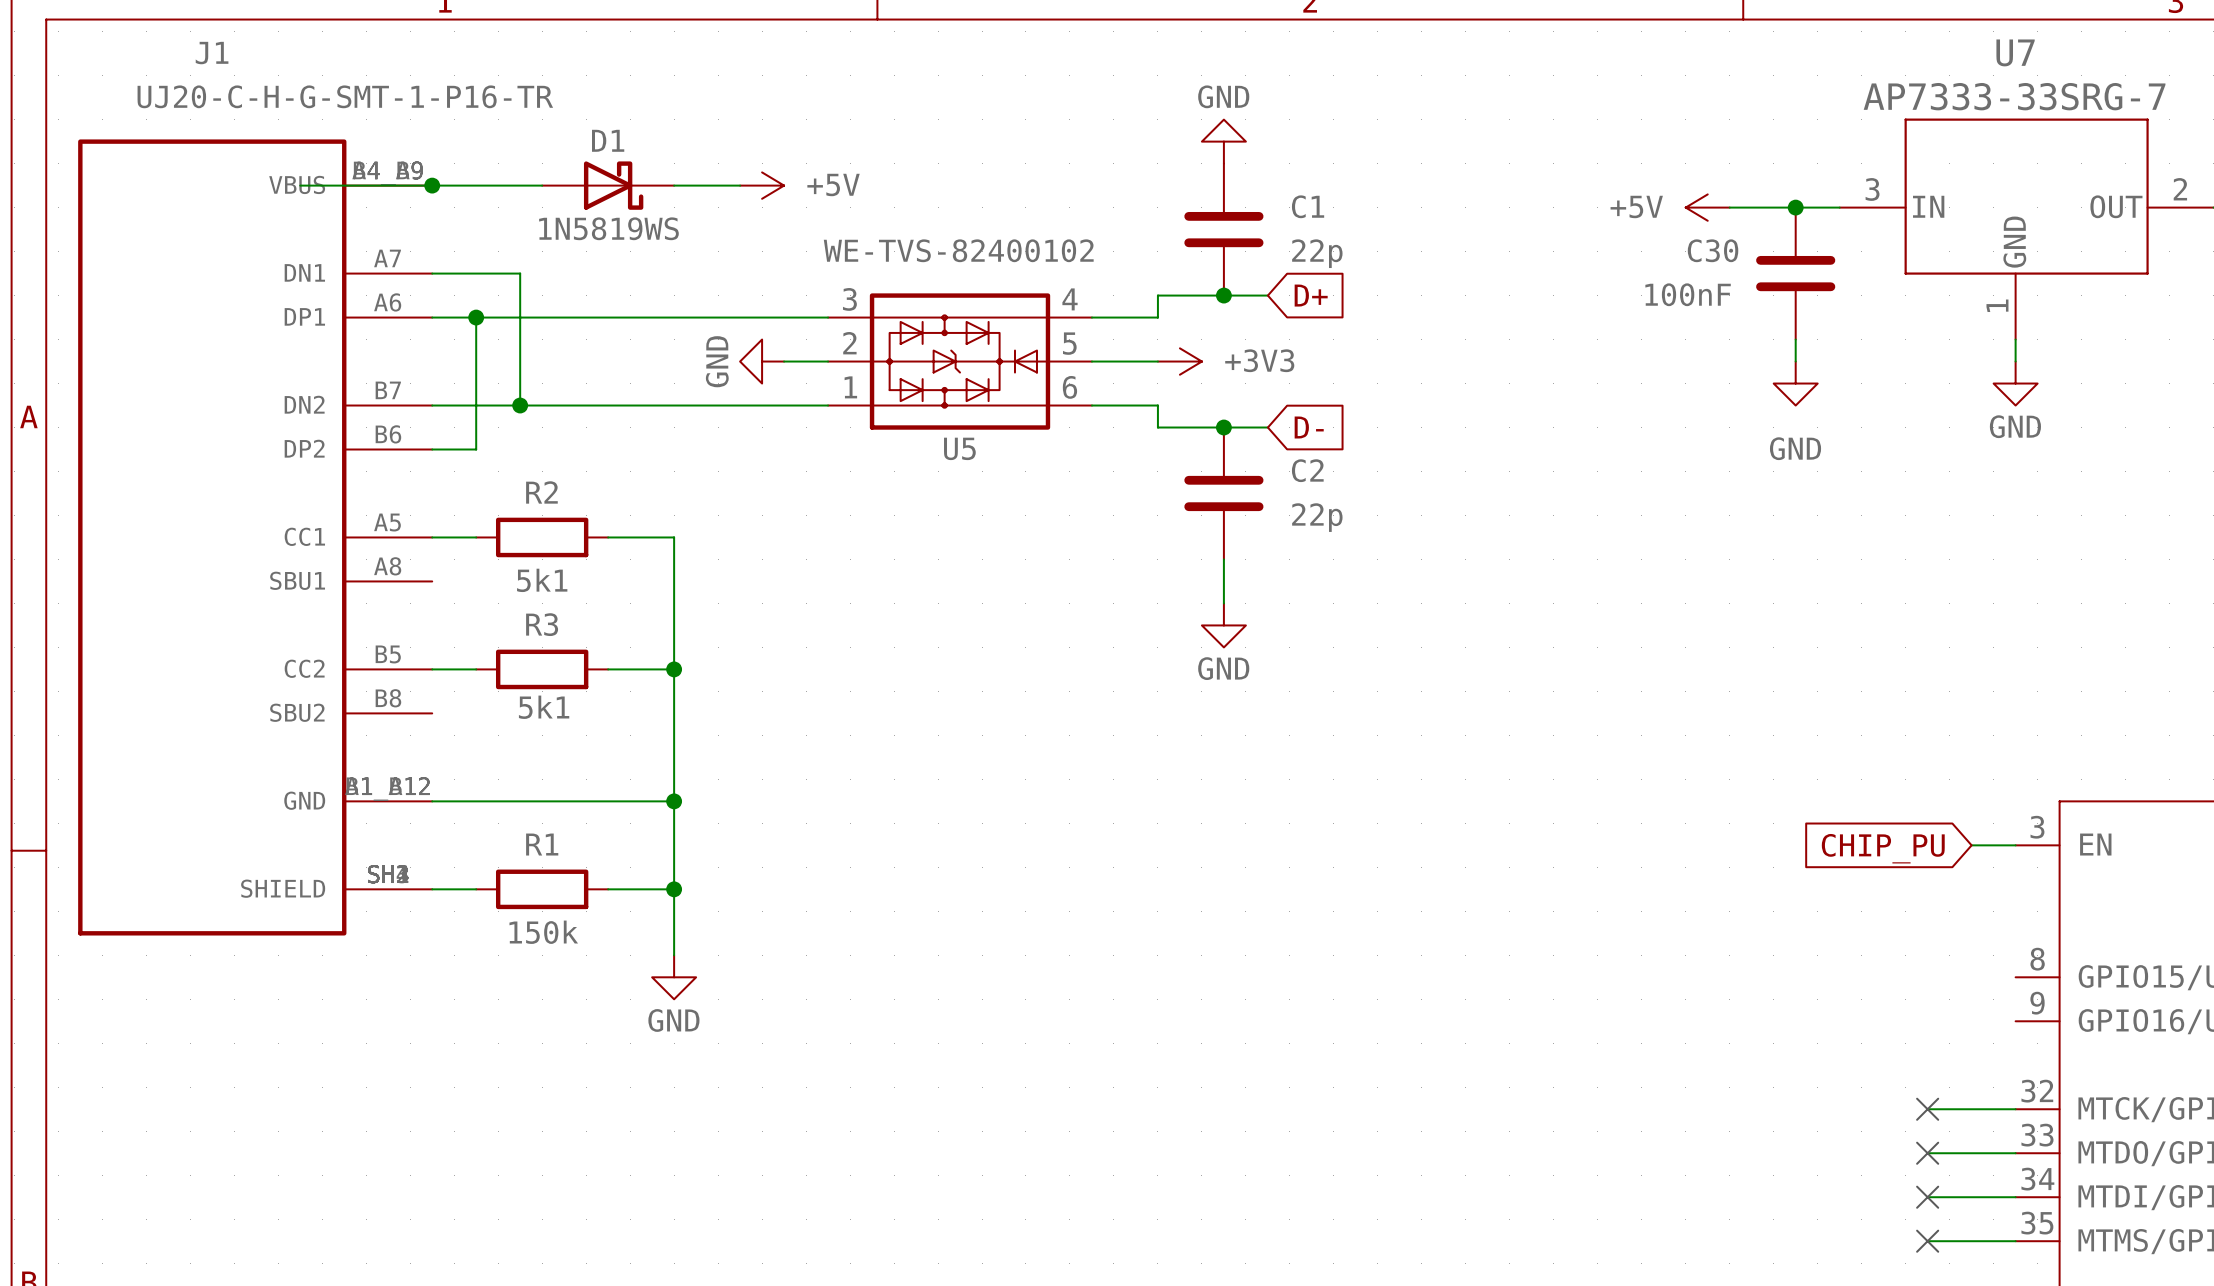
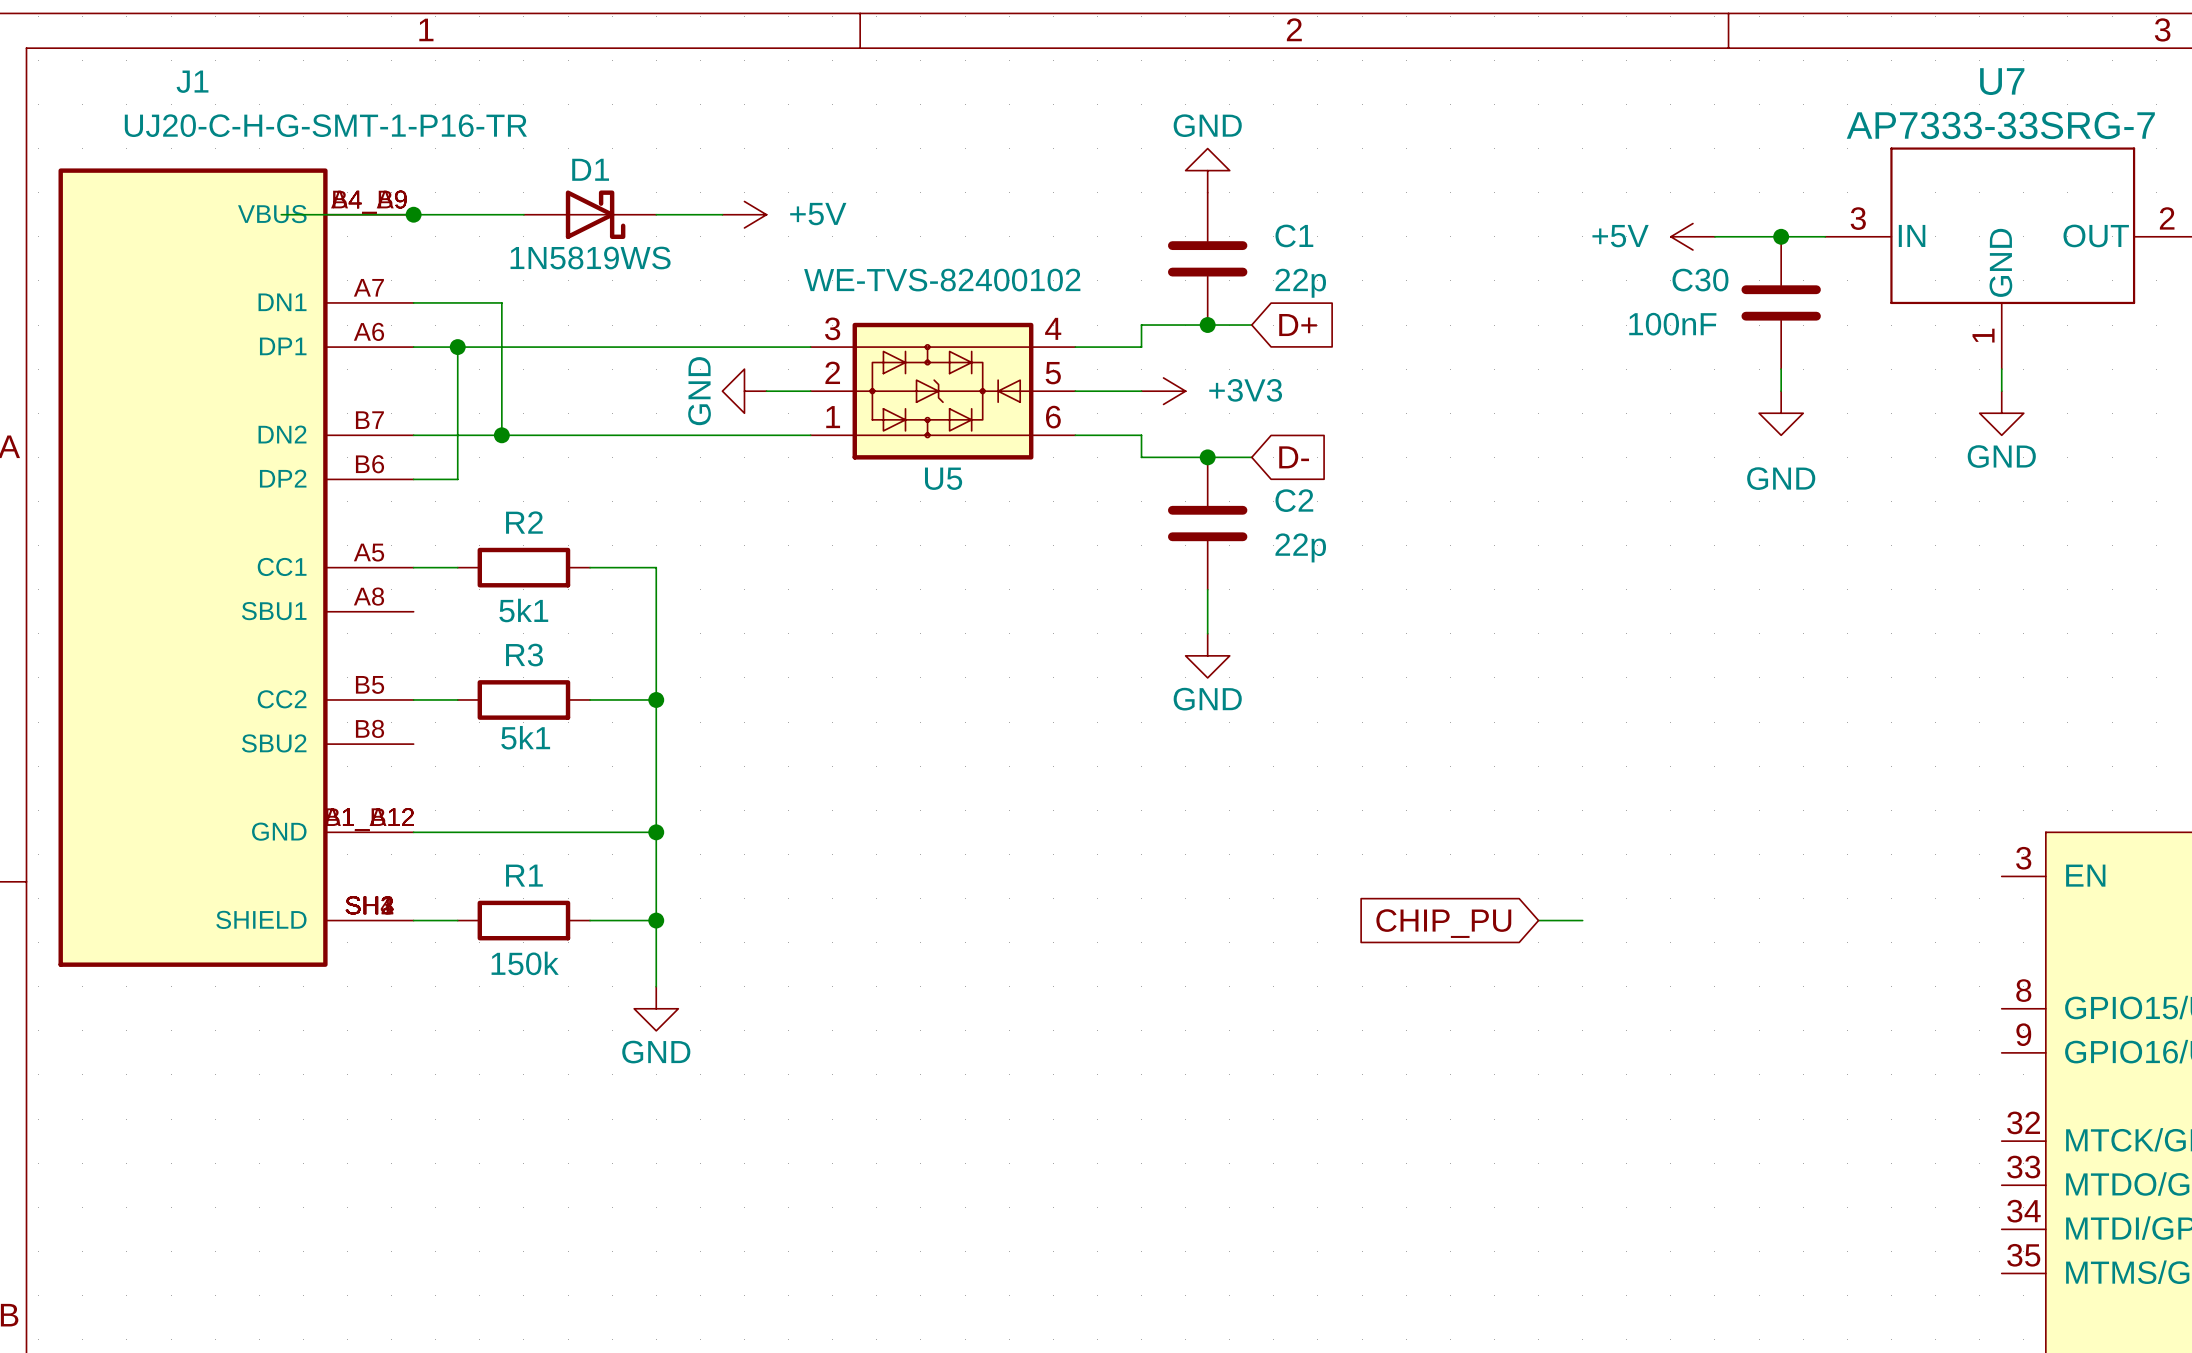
wire: (1971, 845) (2015, 845) -> (1538, 920) (1582, 920)
global label position: CHIP_PU (1883, 848) -> CHIP_PU (1443, 923)
wire: (1927, 1109) (2015, 1109) -> none
no-connect mark: (1927, 1109) -> none
wire: (1927, 1153) (2015, 1153) -> none
no-connect mark: (1927, 1153) -> none
wire: (1927, 1197) (2015, 1197) -> none
no-connect mark: (1927, 1197) -> none
wire: (1927, 1241) (2015, 1241) -> none
no-connect mark: (1927, 1241) -> none

